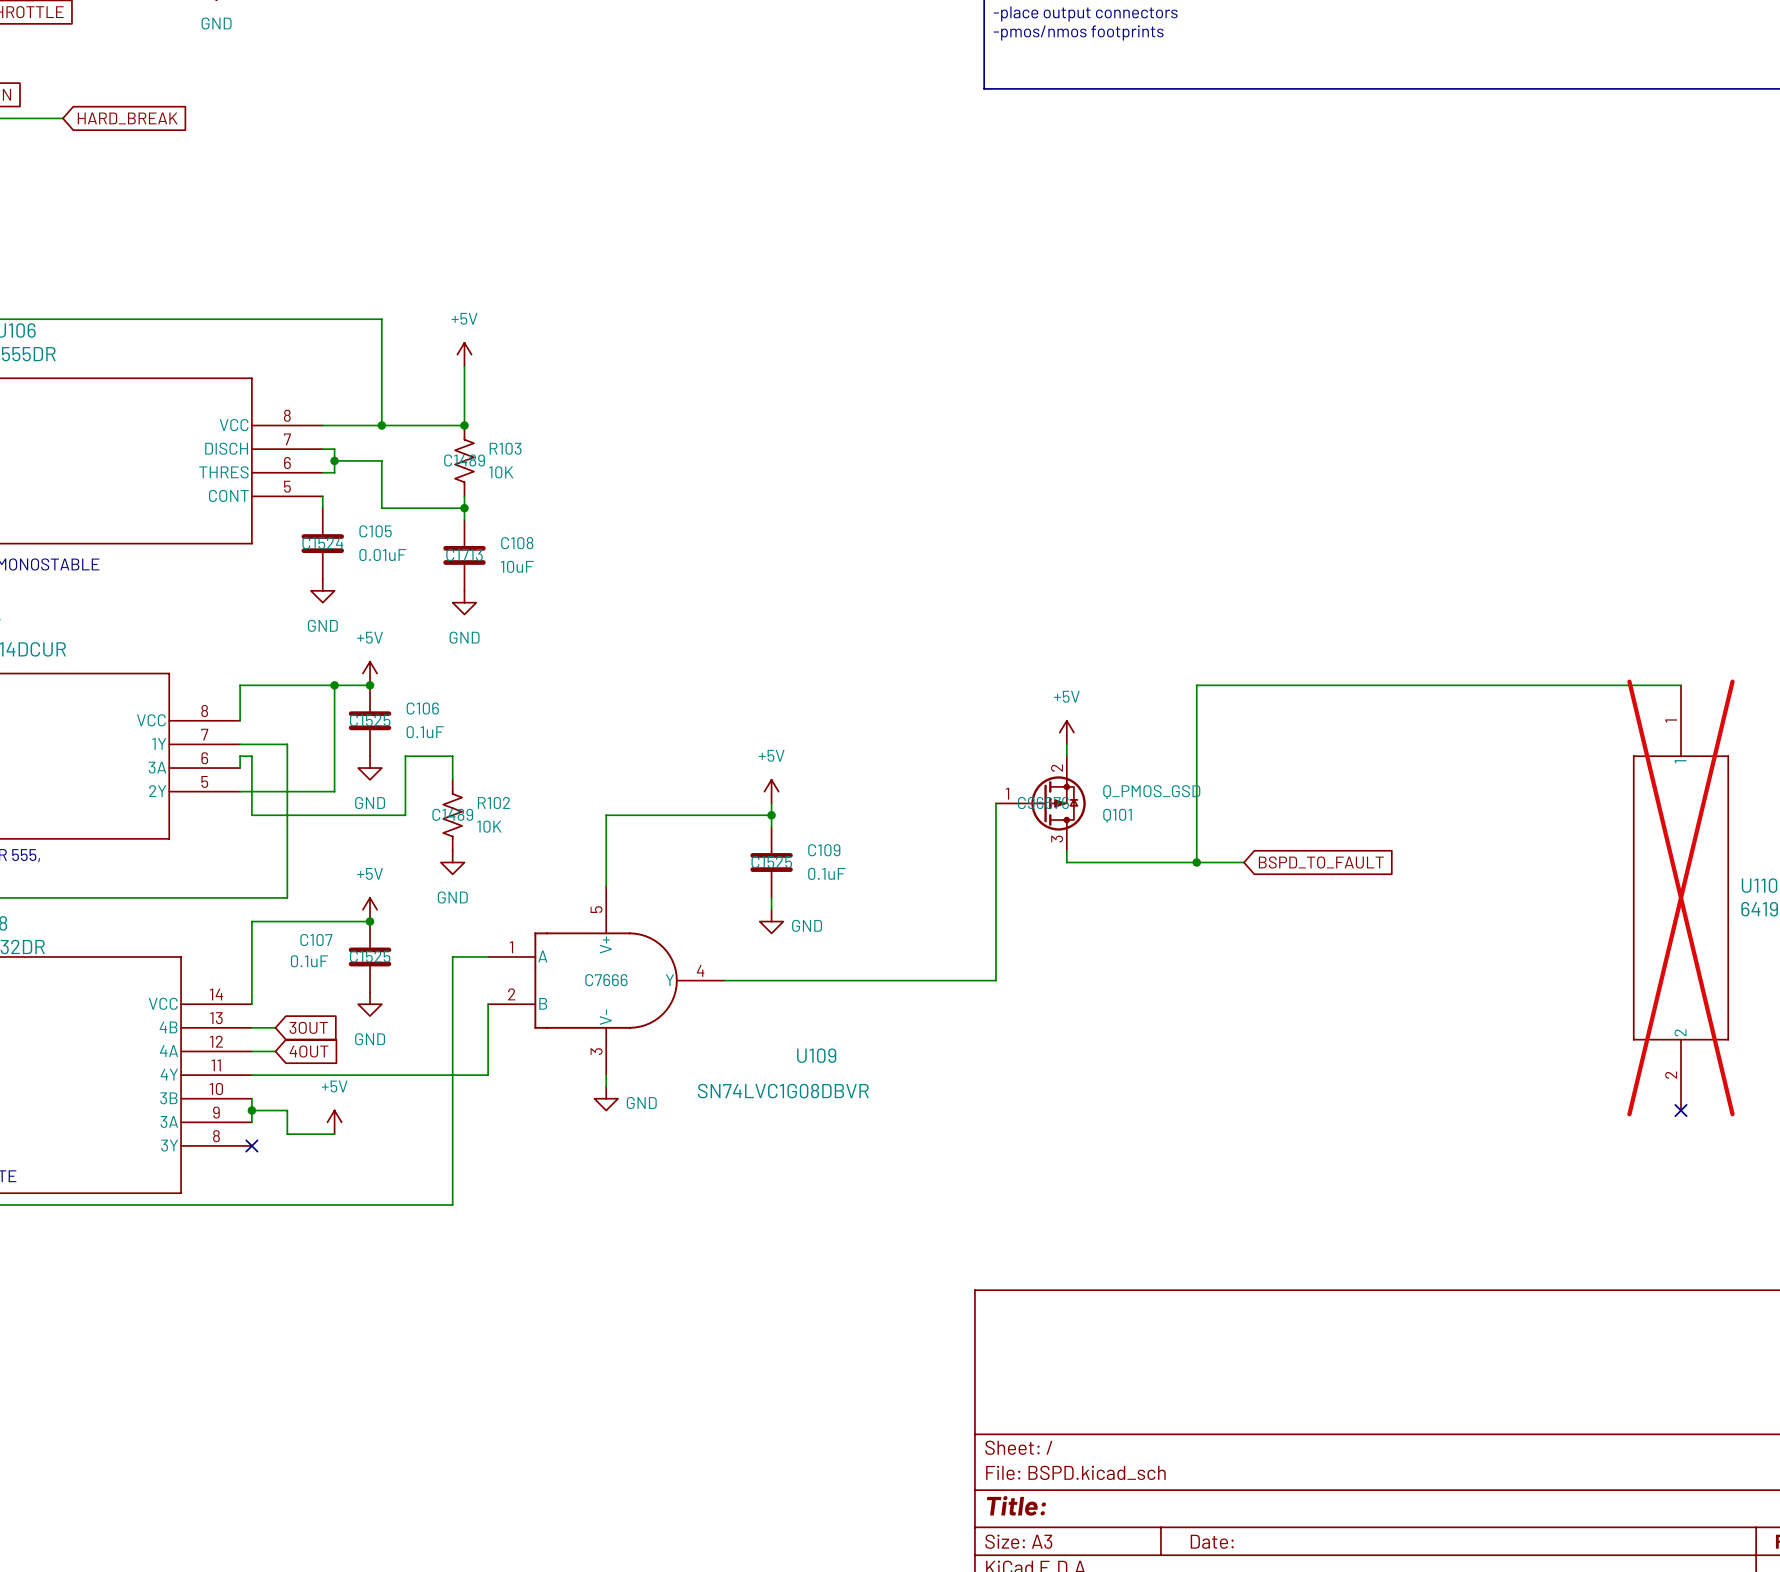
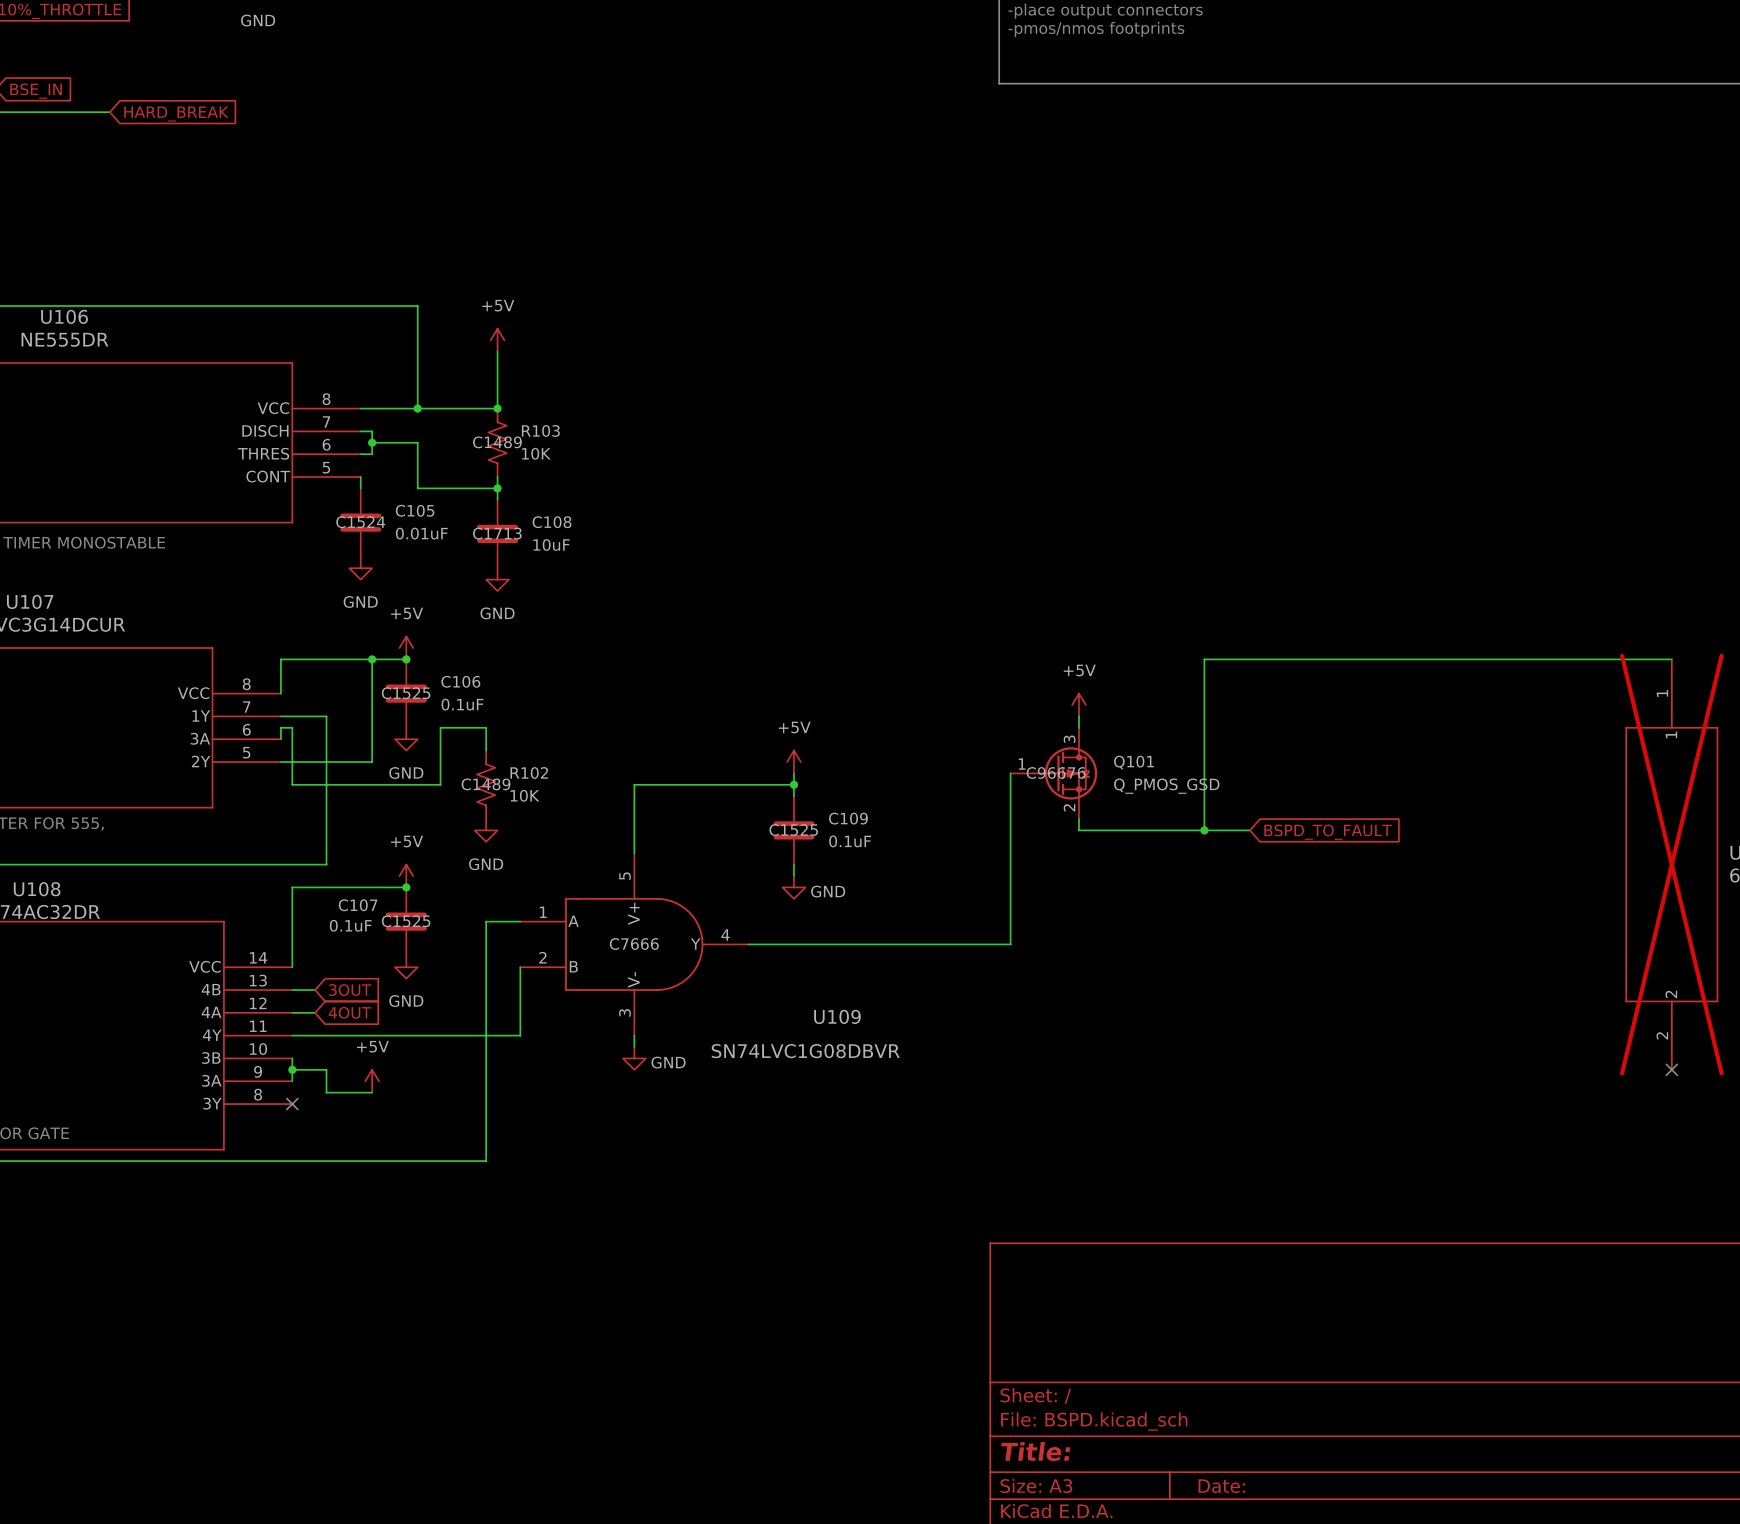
Q101 flip: as is (1052, 803) -> up-down (1065, 773)

